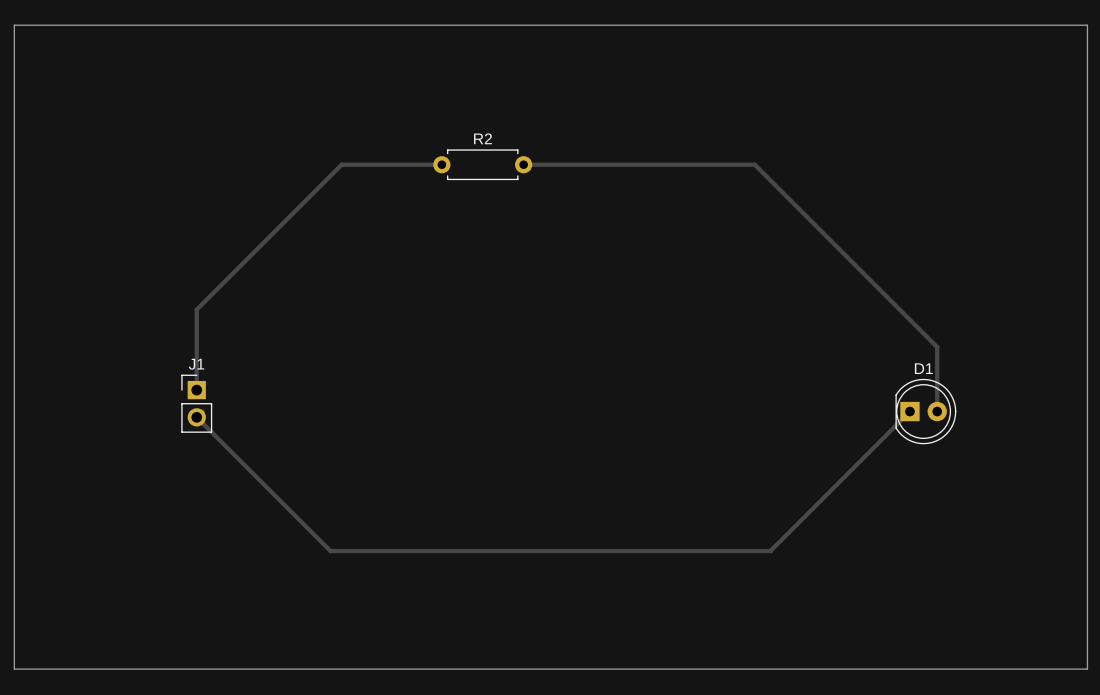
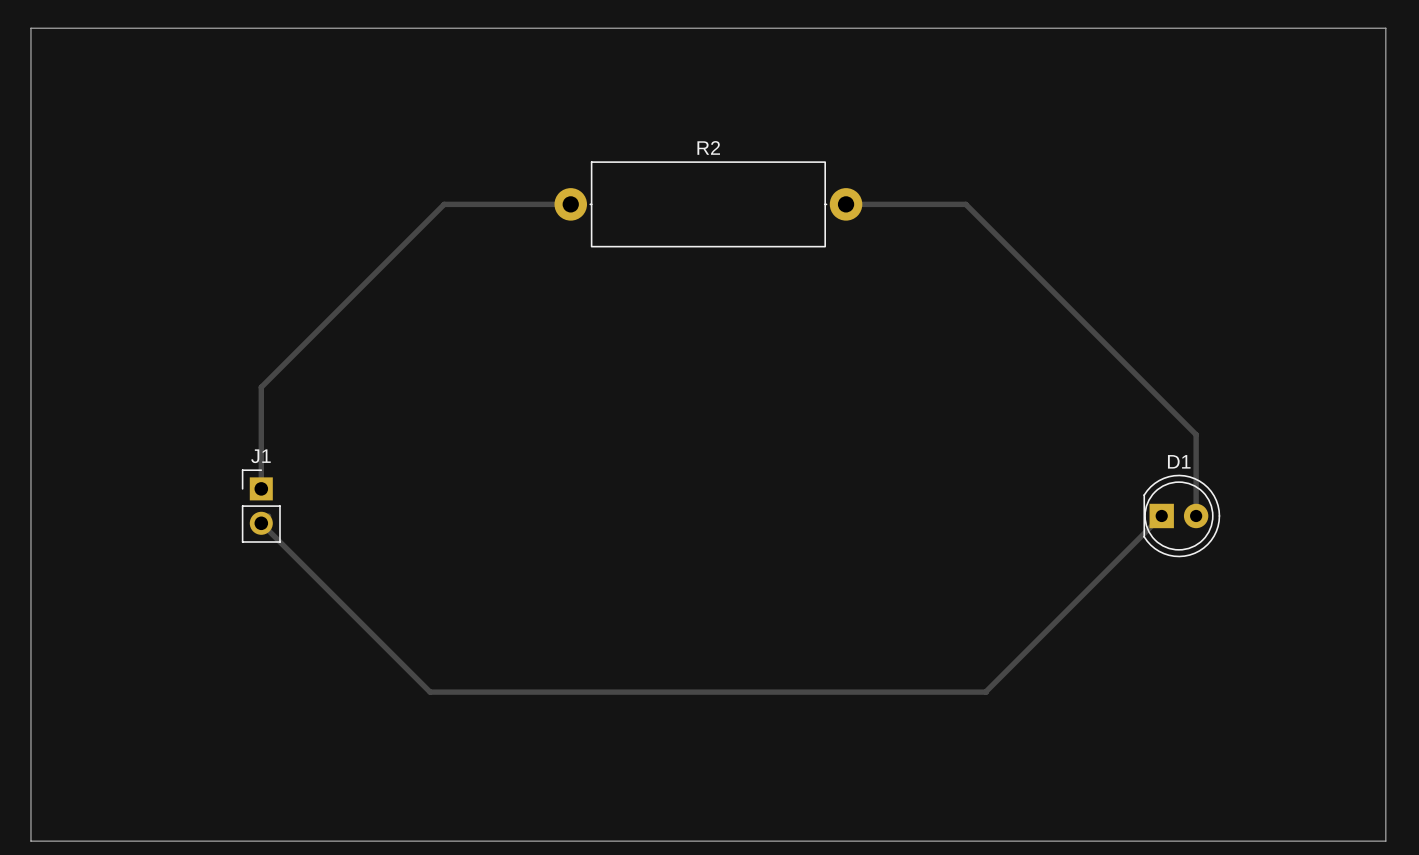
R2 footprint: [433, 149, 533, 181] -> [554, 161, 863, 248]
track: (523, 164) (659, 164) -> none

